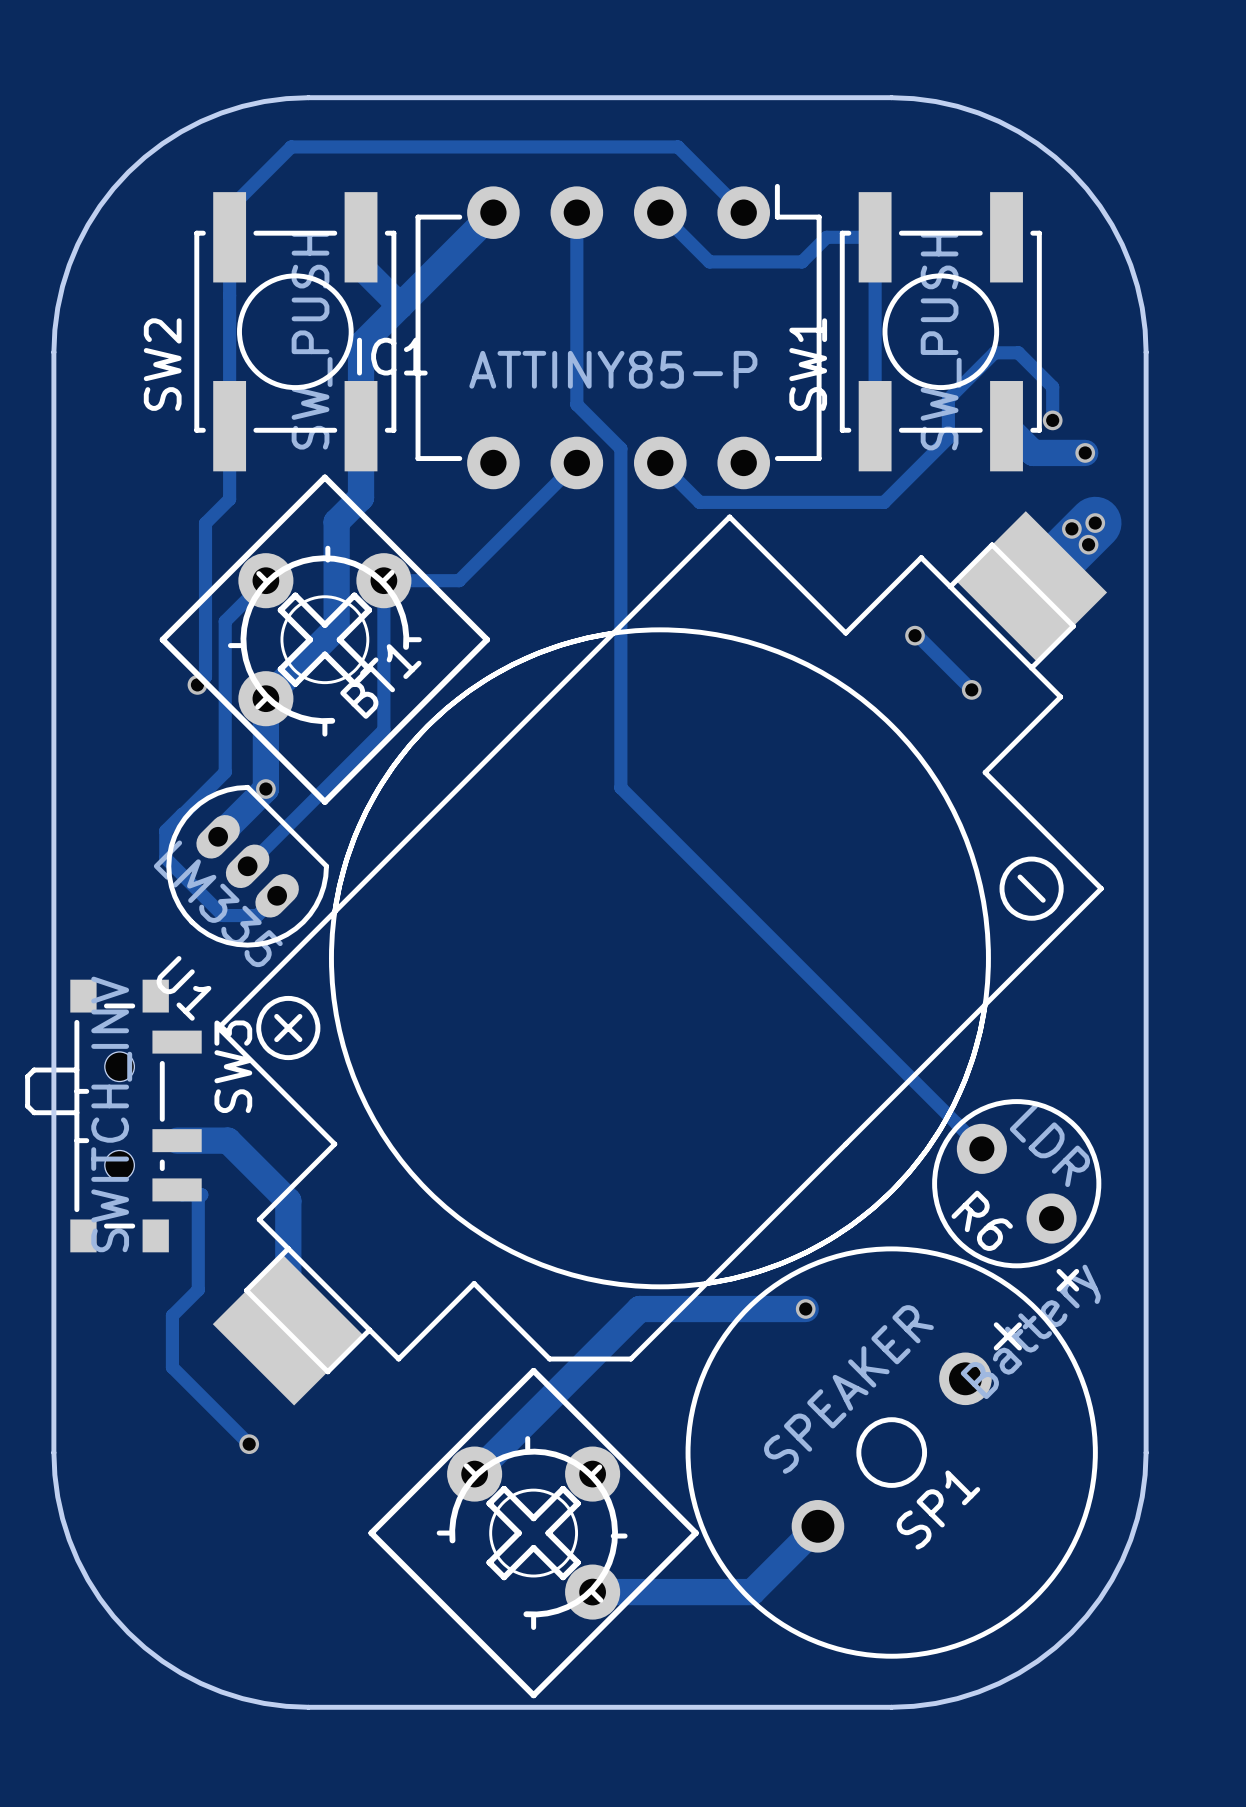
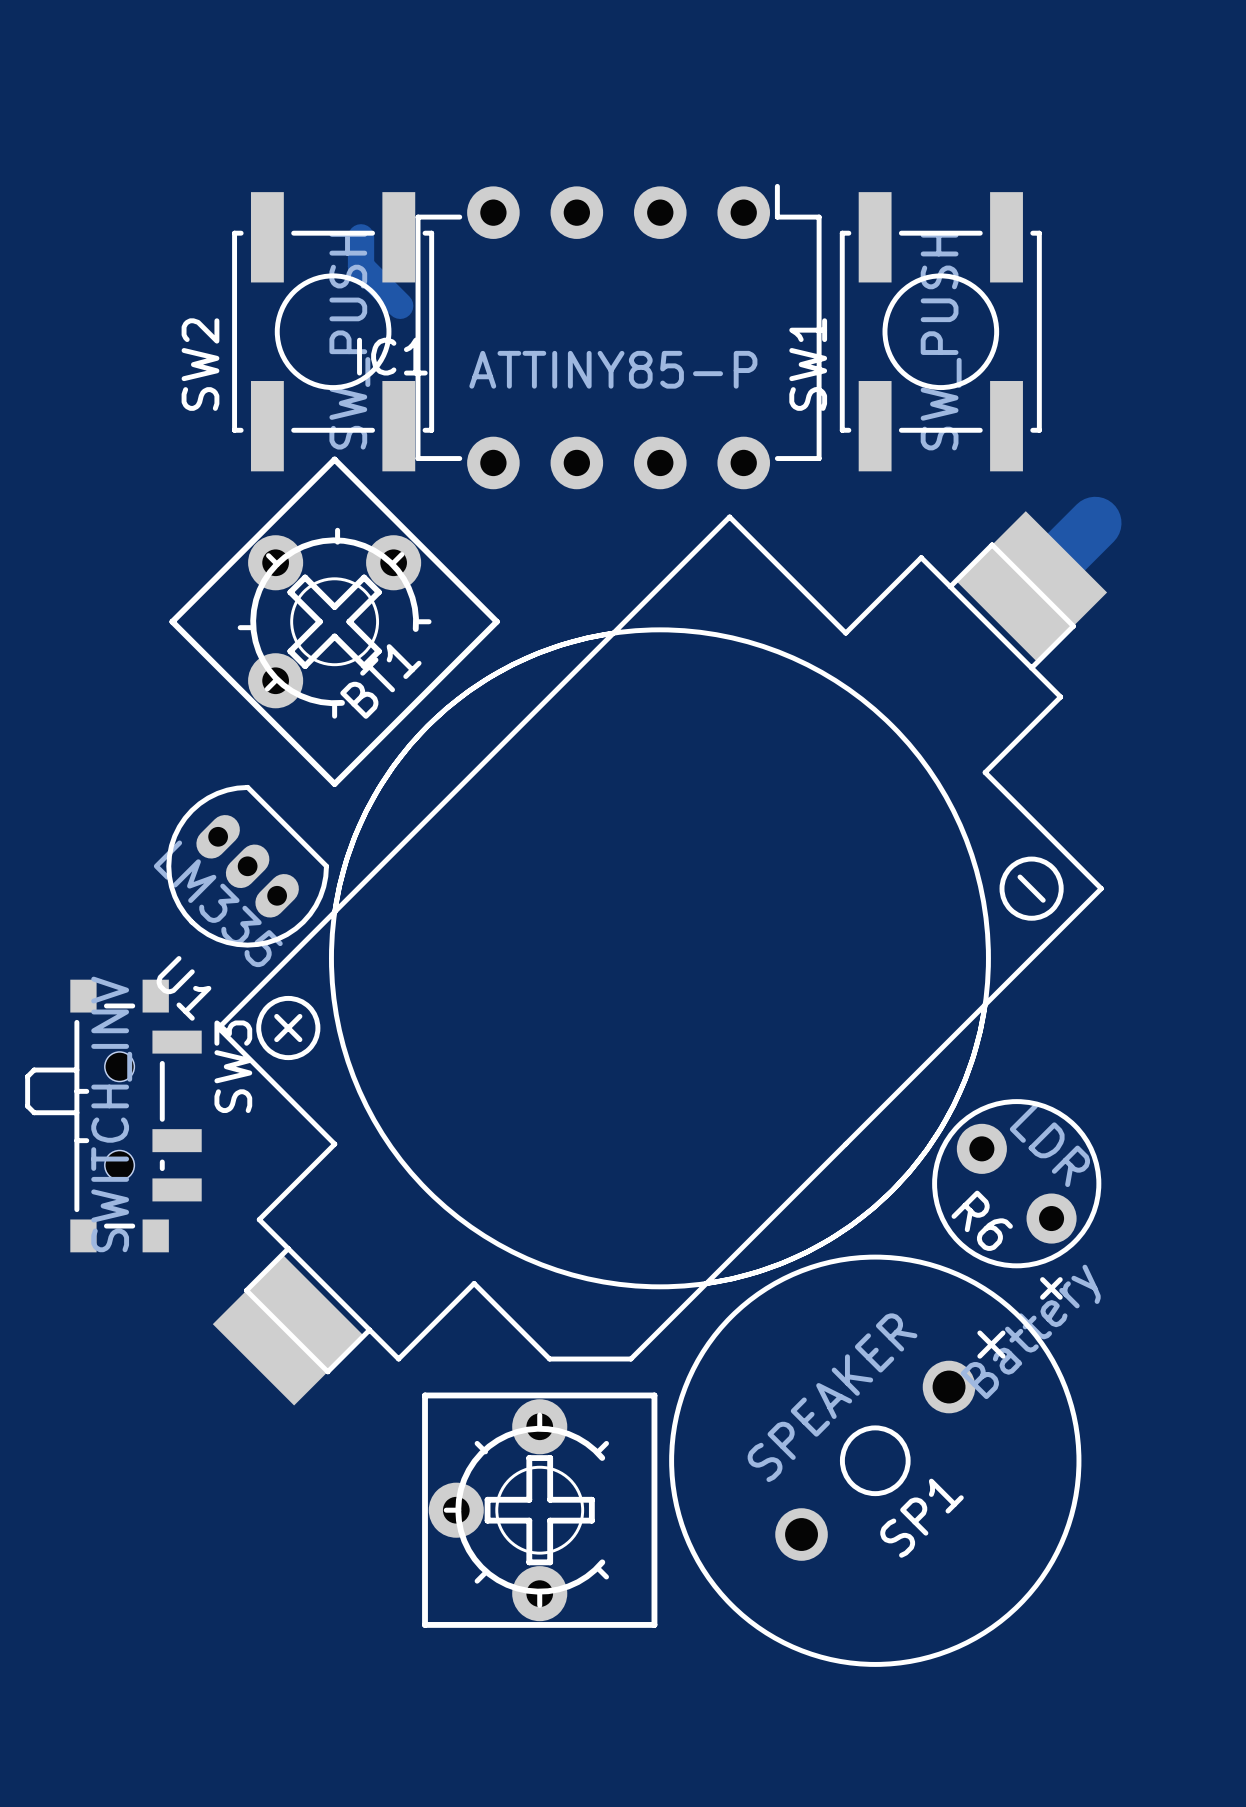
board edge: (308, 97) (891, 97) (935, 101) (957, 106) (999, 121) (1037, 143) (1071, 172) (1086, 188) (1100, 206) (1122, 244) (1137, 286) (1145, 330) (1146, 352) (1145, 1474) (1137, 1518) (1130, 1539) (1122, 1560) (1100, 1598) (1071, 1632) (1055, 1647) (1037, 1661) (999, 1683) (957, 1698) (913, 1706) (891, 1707) (308, 1707) (264, 1703) (242, 1698) (200, 1683) (162, 1661) (128, 1632) (113, 1616) (99, 1598) (77, 1560) (62, 1518) (54, 1474) (53, 1452) (53, 352) (57, 308) (69, 265) (87, 224) (113, 188) (144, 157) (181, 131) (221, 113) (264, 101) (308, 97) -> none
track: (493, 212) (361, 345) (361, 497) (336, 522) (336, 627) (265, 698) (265, 789) (218, 836) -> none
track: (576, 212) (576, 404) (620, 448) (620, 787) (981, 1148) -> none
track: (660, 212) (709, 261) (802, 261) (826, 237) (875, 237) (875, 426) -> none
track: (743, 212) (678, 146) (291, 146) (229, 208) (229, 499) (205, 523) (205, 676) (197, 684) -> none
SW2 position: (295, 331) -> (333, 331)
track: (1052, 420) (1052, 387) (1018, 352) (994, 352) (948, 399) (948, 438) (884, 502) (699, 502) (660, 462) -> none
via: (1052, 420) -> none
track: (1006, 426) (1033, 452) (1085, 452) -> none
via: (1085, 452) -> none
track: (576, 462) (459, 580) (383, 580) (383, 730) (247, 866) -> none
via: (1095, 523) -> none
via: (1071, 528) -> none
via: (1088, 544) -> none
track: (265, 580) (225, 621) (225, 772) (165, 830) (165, 858) (222, 915) (257, 915) (277, 895) -> none
track: (915, 635) (917, 635) (971, 689) -> none
via: (915, 635) -> none
part position: (324, 639) -> (334, 621)
via: (197, 684) -> none
via: (971, 689) -> none
via: (265, 789) -> none
track: (177, 1140) (227, 1140) (288, 1200) (288, 1329) -> none
track: (177, 1189) (182, 1194) (201, 1194) (198, 1198) (198, 1289) (172, 1315) (172, 1367) (249, 1444) -> none
track: (805, 1309) (639, 1309) (474, 1474) -> none
via: (805, 1309) -> none
via: (249, 1444) -> none
SP1 position: (891, 1452) -> (875, 1460)
track: (817, 1526) (752, 1592) (592, 1592) -> none
part rotation: 0° (533, 1533) -> 135° counterclockwise (539, 1510)

